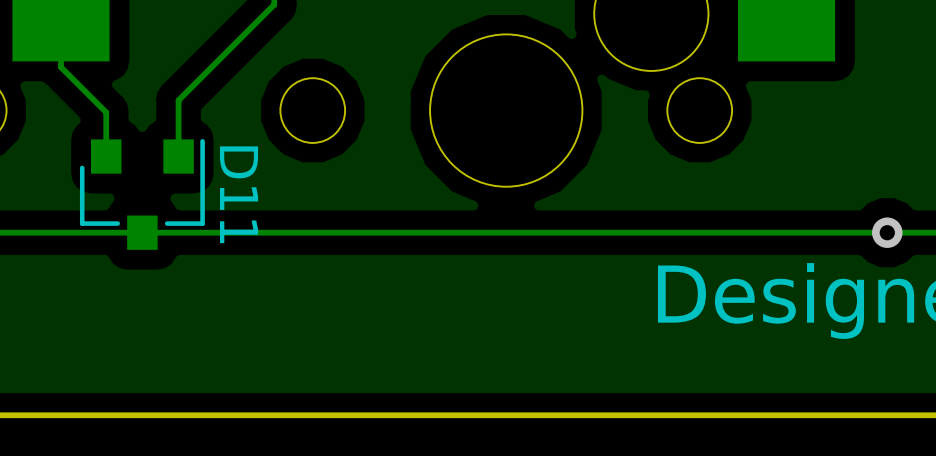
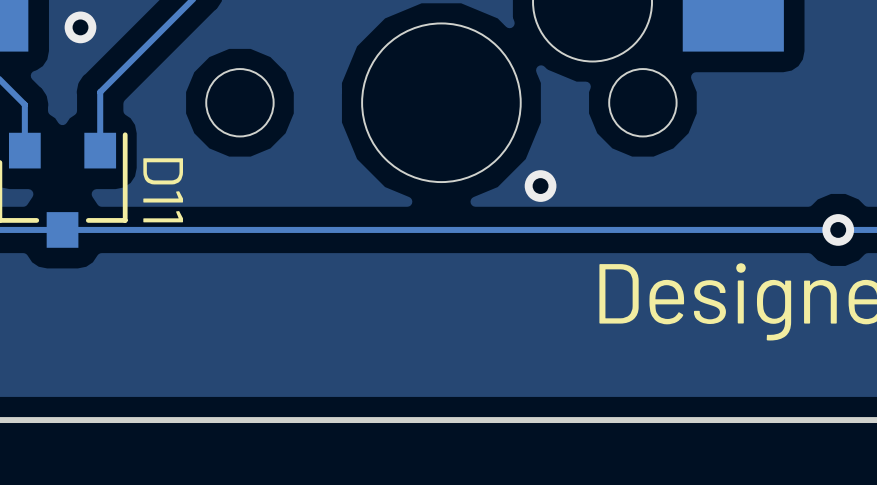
via: none -> (80, 27)
via: none -> (540, 186)

